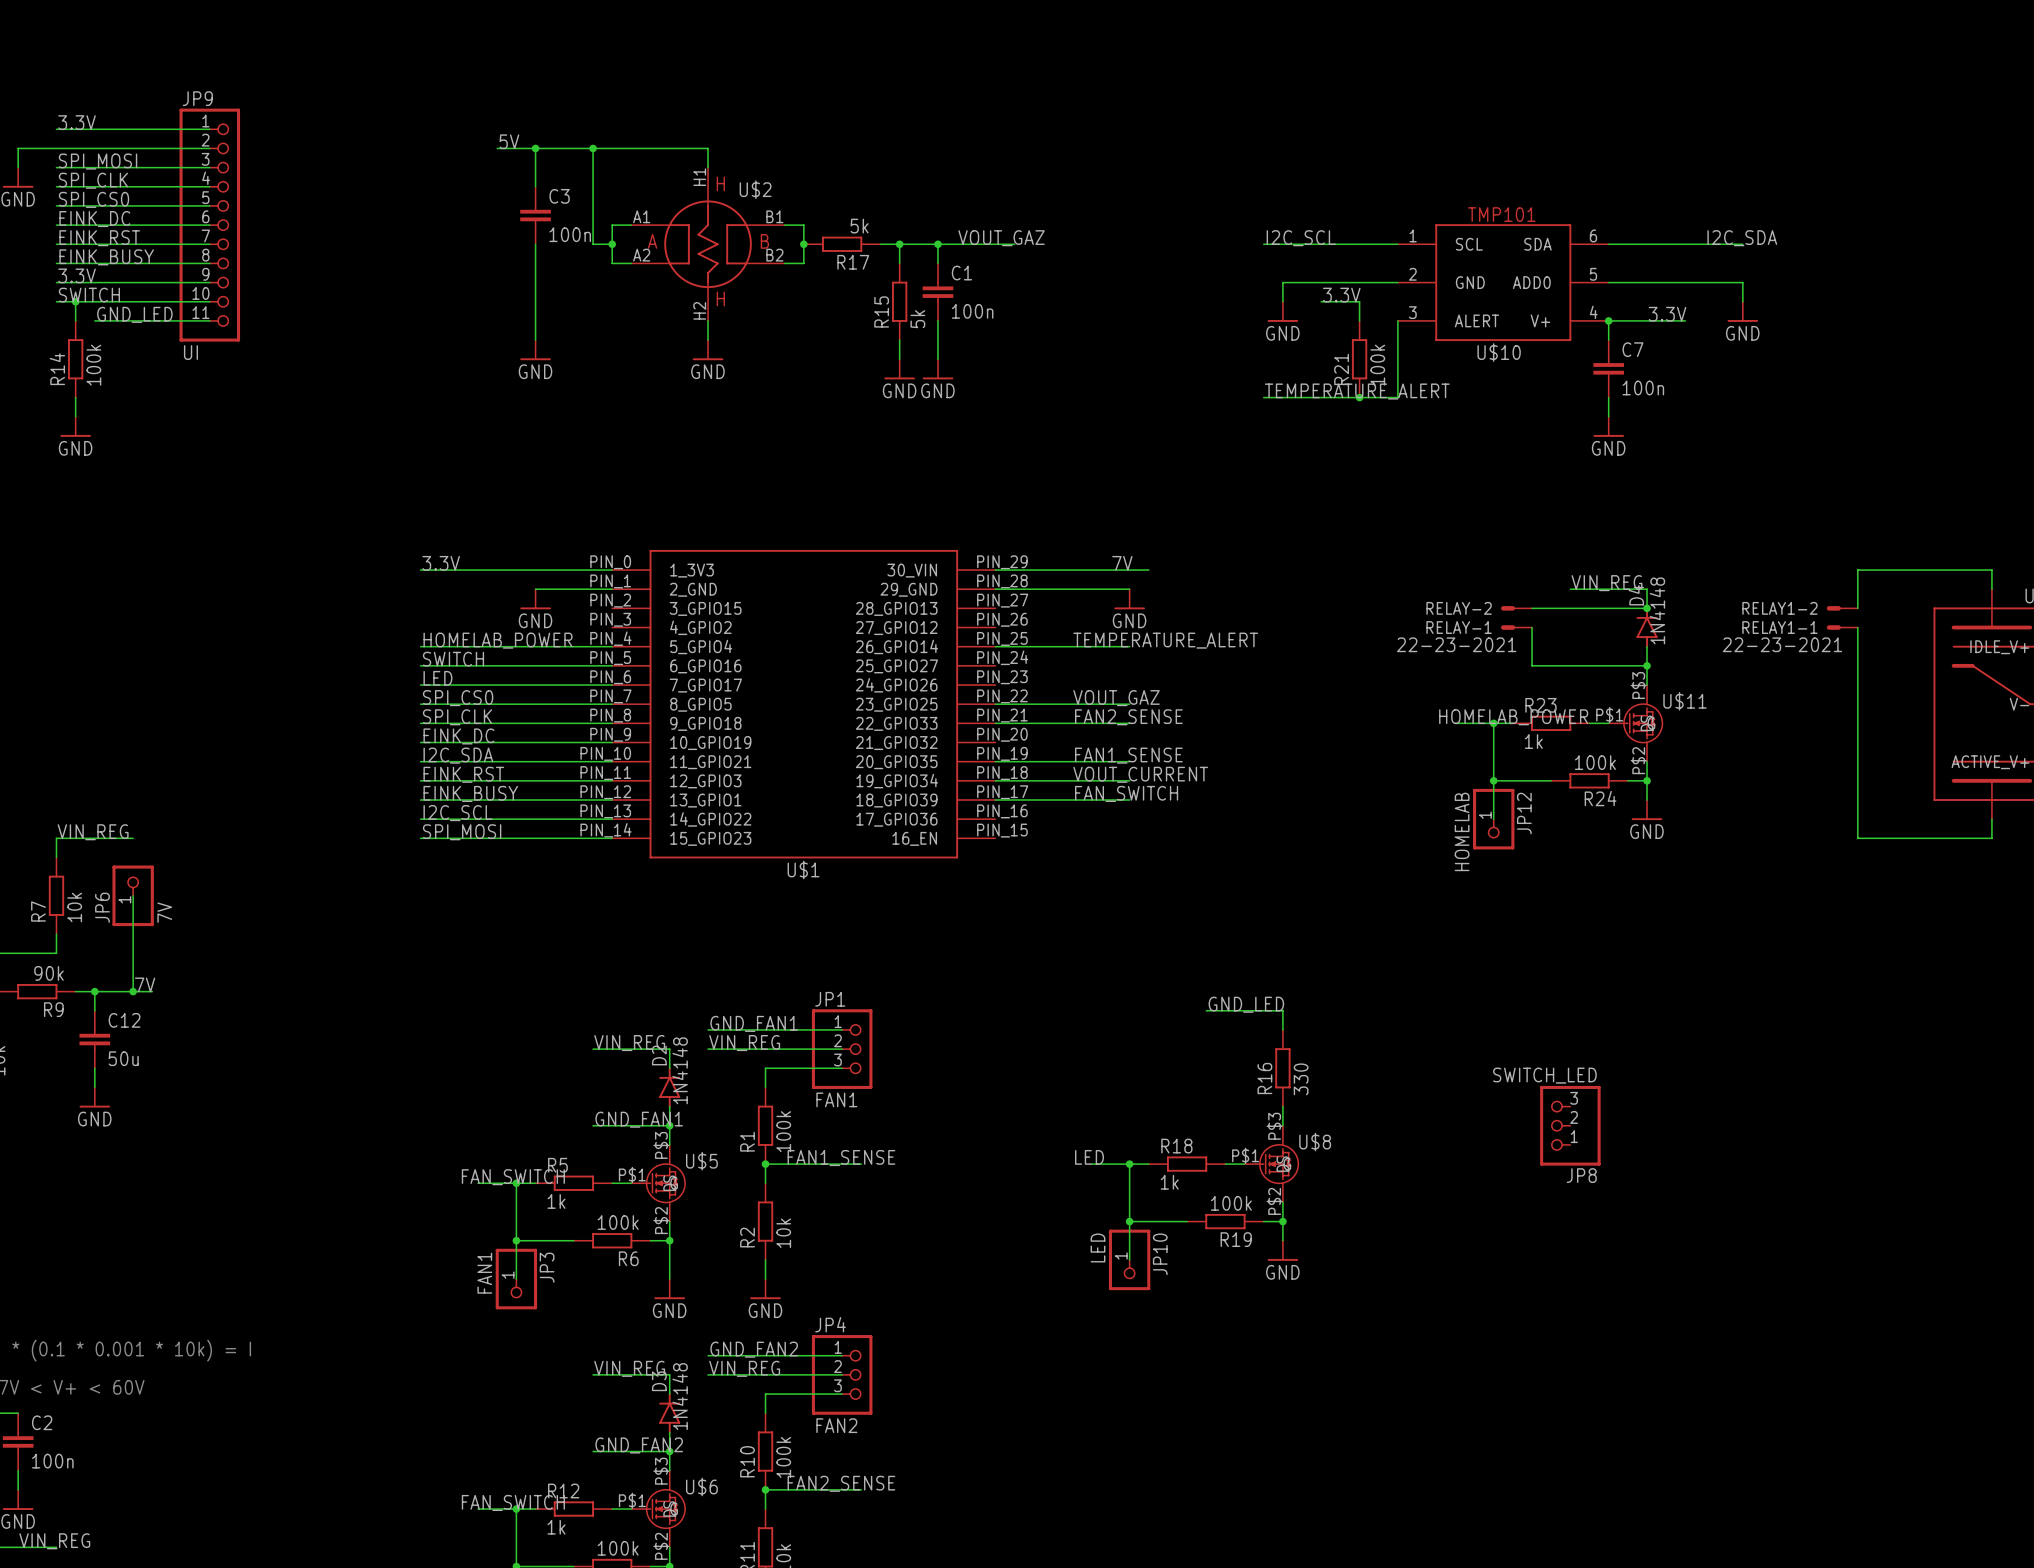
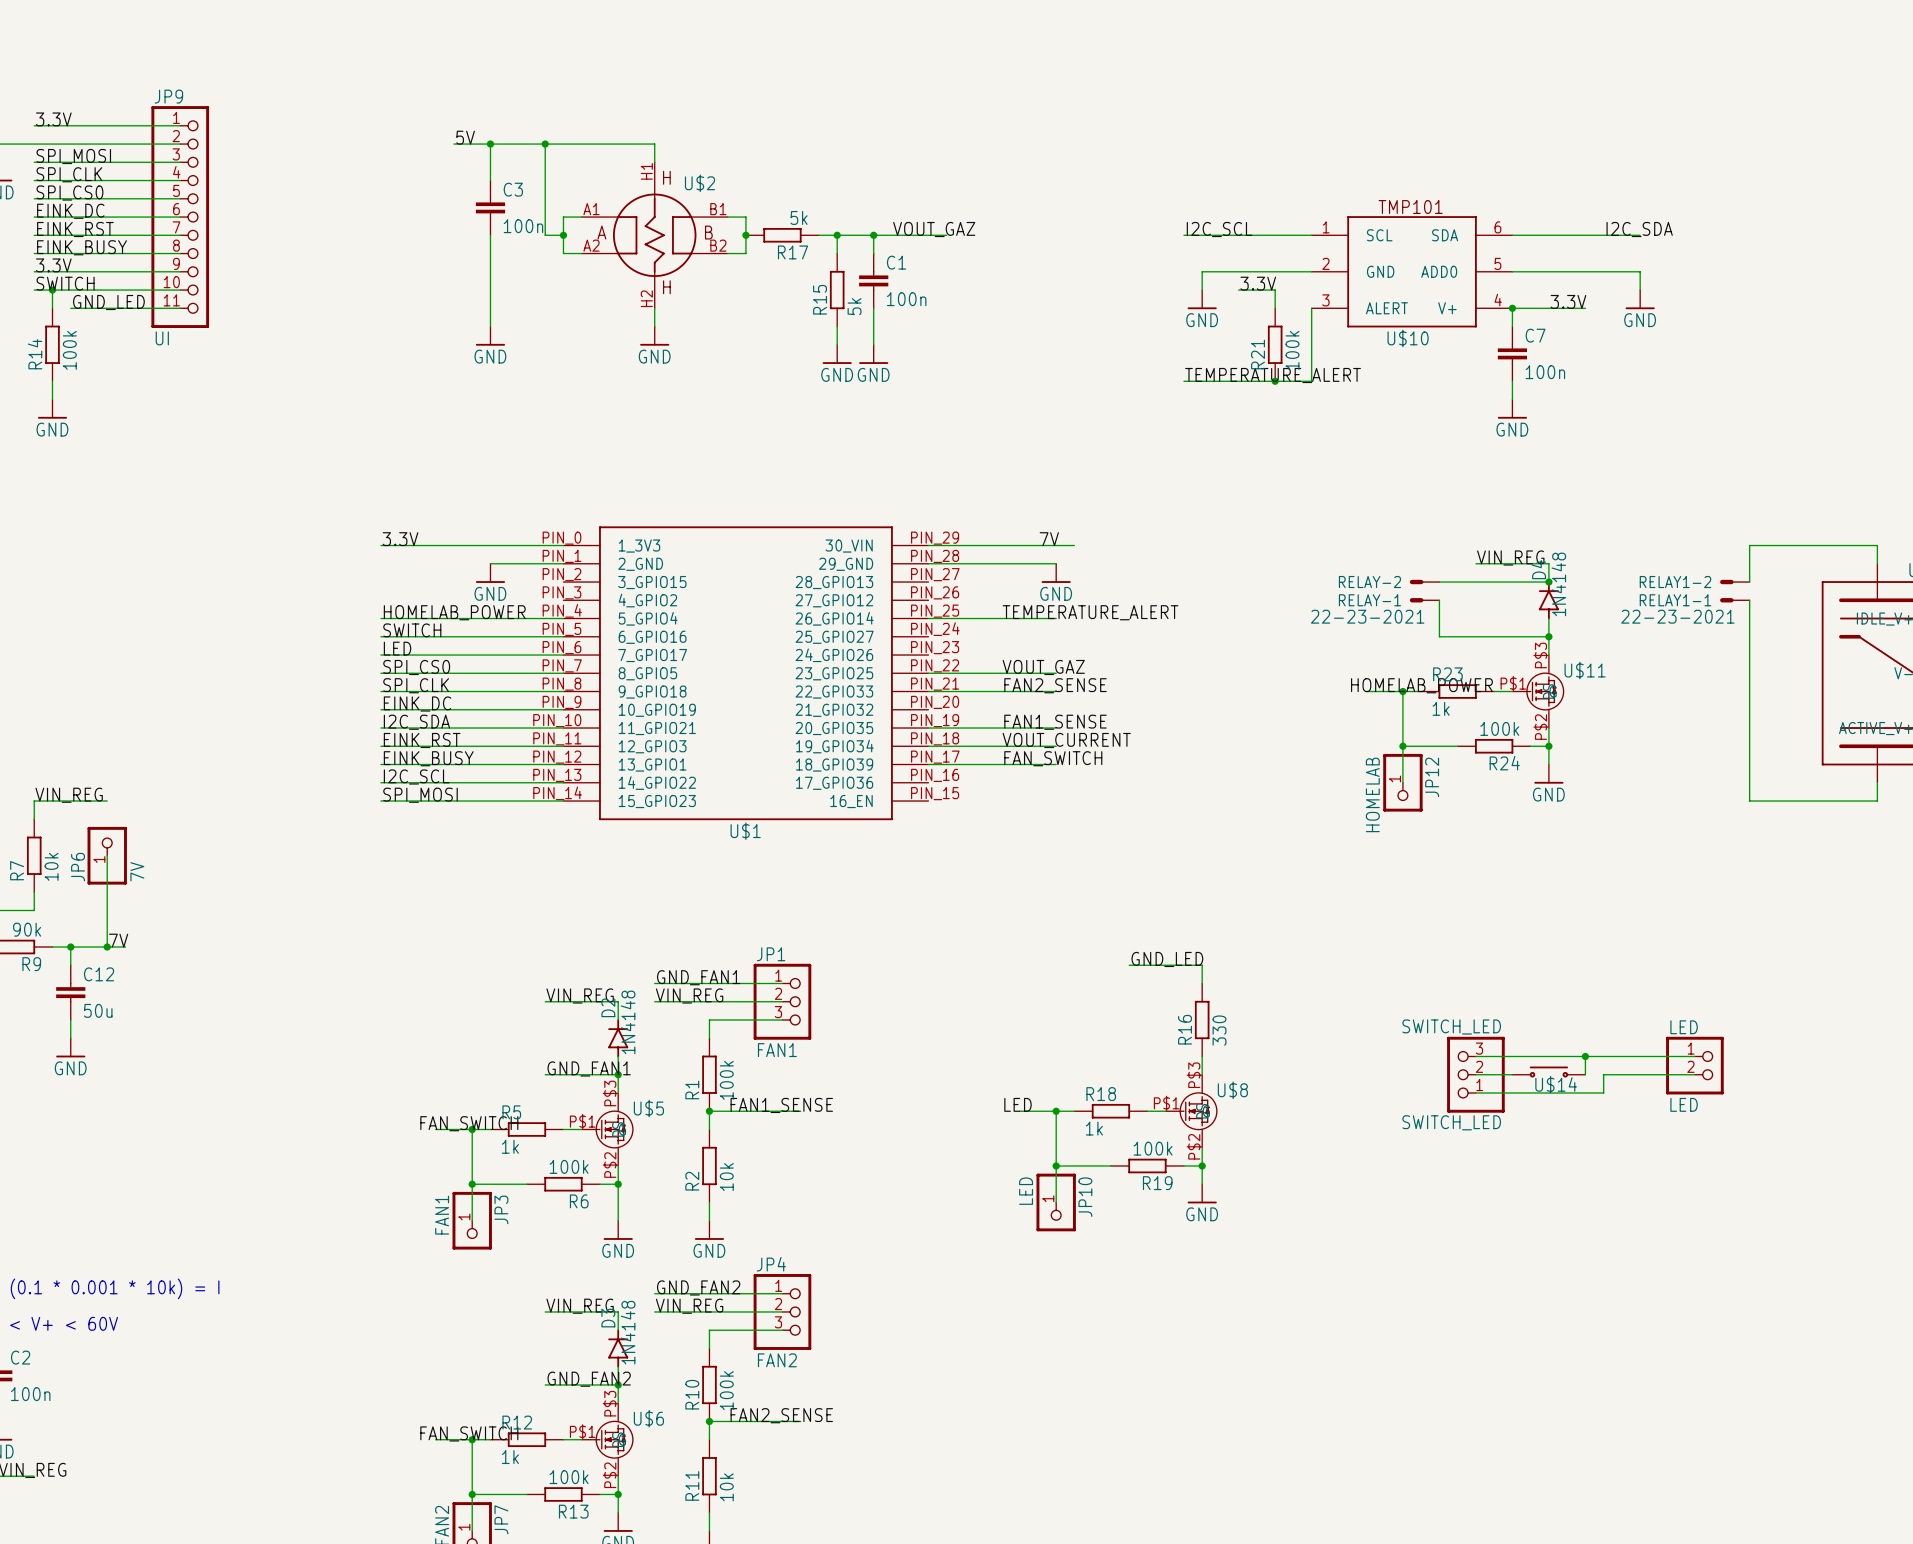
wire: none -> (1475, 1056) (1694, 1056)
wire: none -> (1585, 1056) (1585, 1074)
junction: none -> (1585, 1056)
LED: none -> LED (1694, 1065)
U$14: none -> (1548, 1072)
wire: none -> (1475, 1074) (1512, 1074)
wire: none -> (1694, 1074) (1603, 1074) (1603, 1092) (1475, 1092)
JP8 name: JP8 (1581, 1175) -> SWITCH_LED (1451, 1122)

